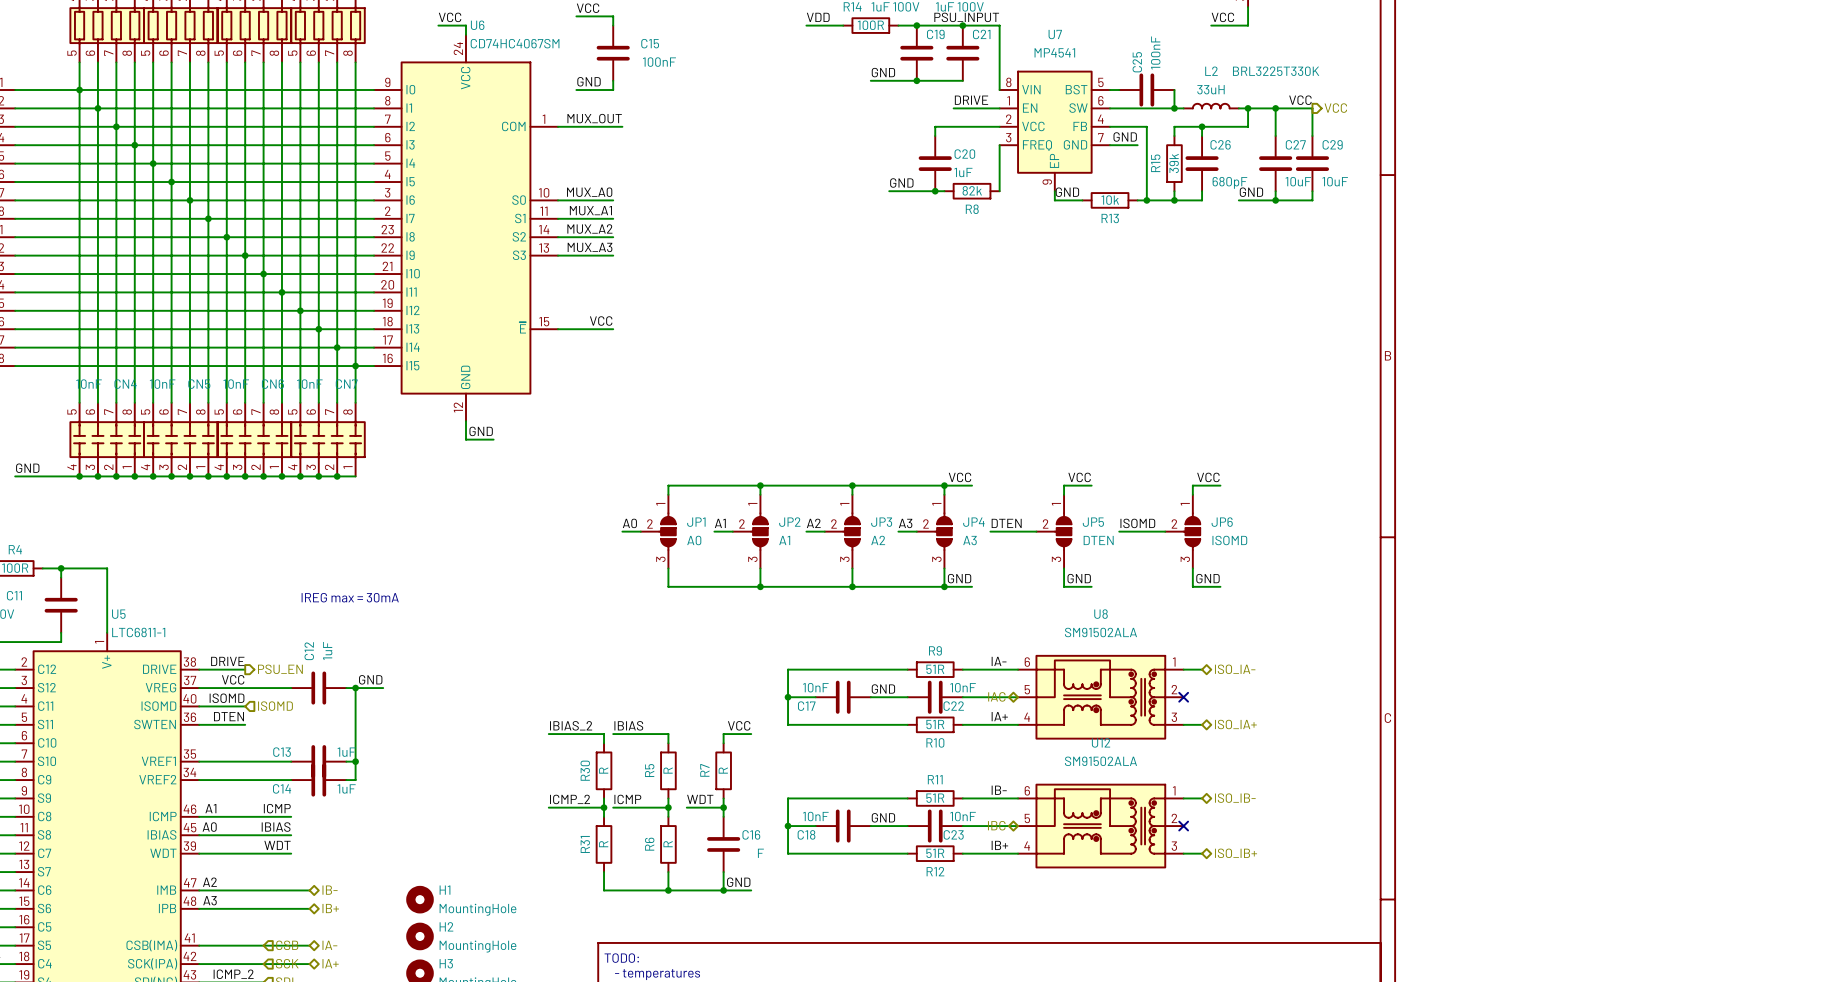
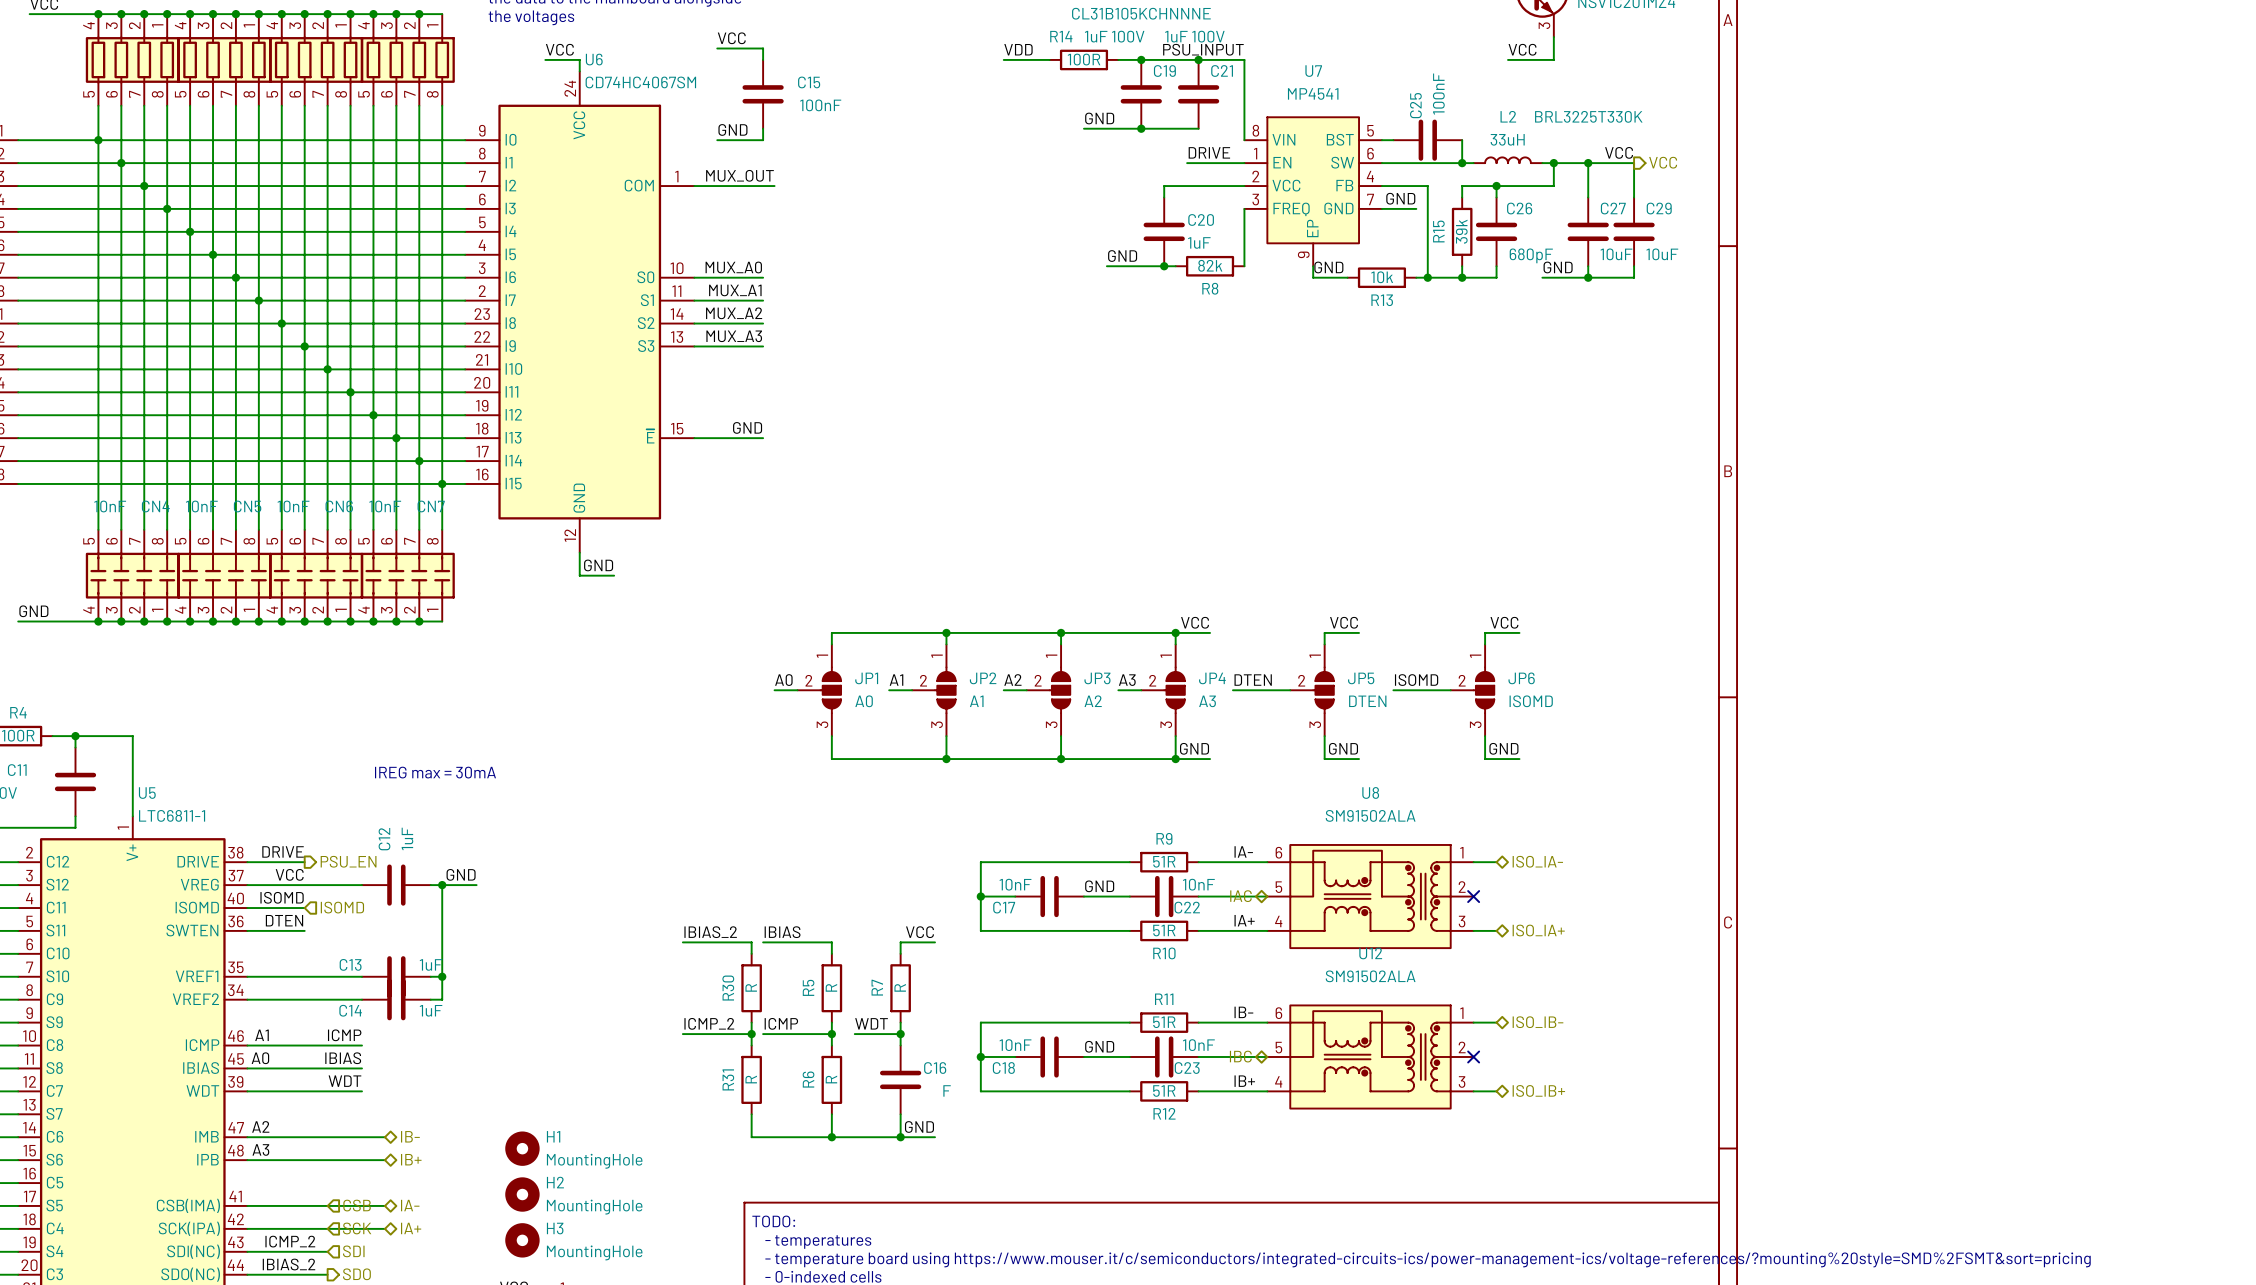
label: VCC (601, 321) -> GND (747, 427)

